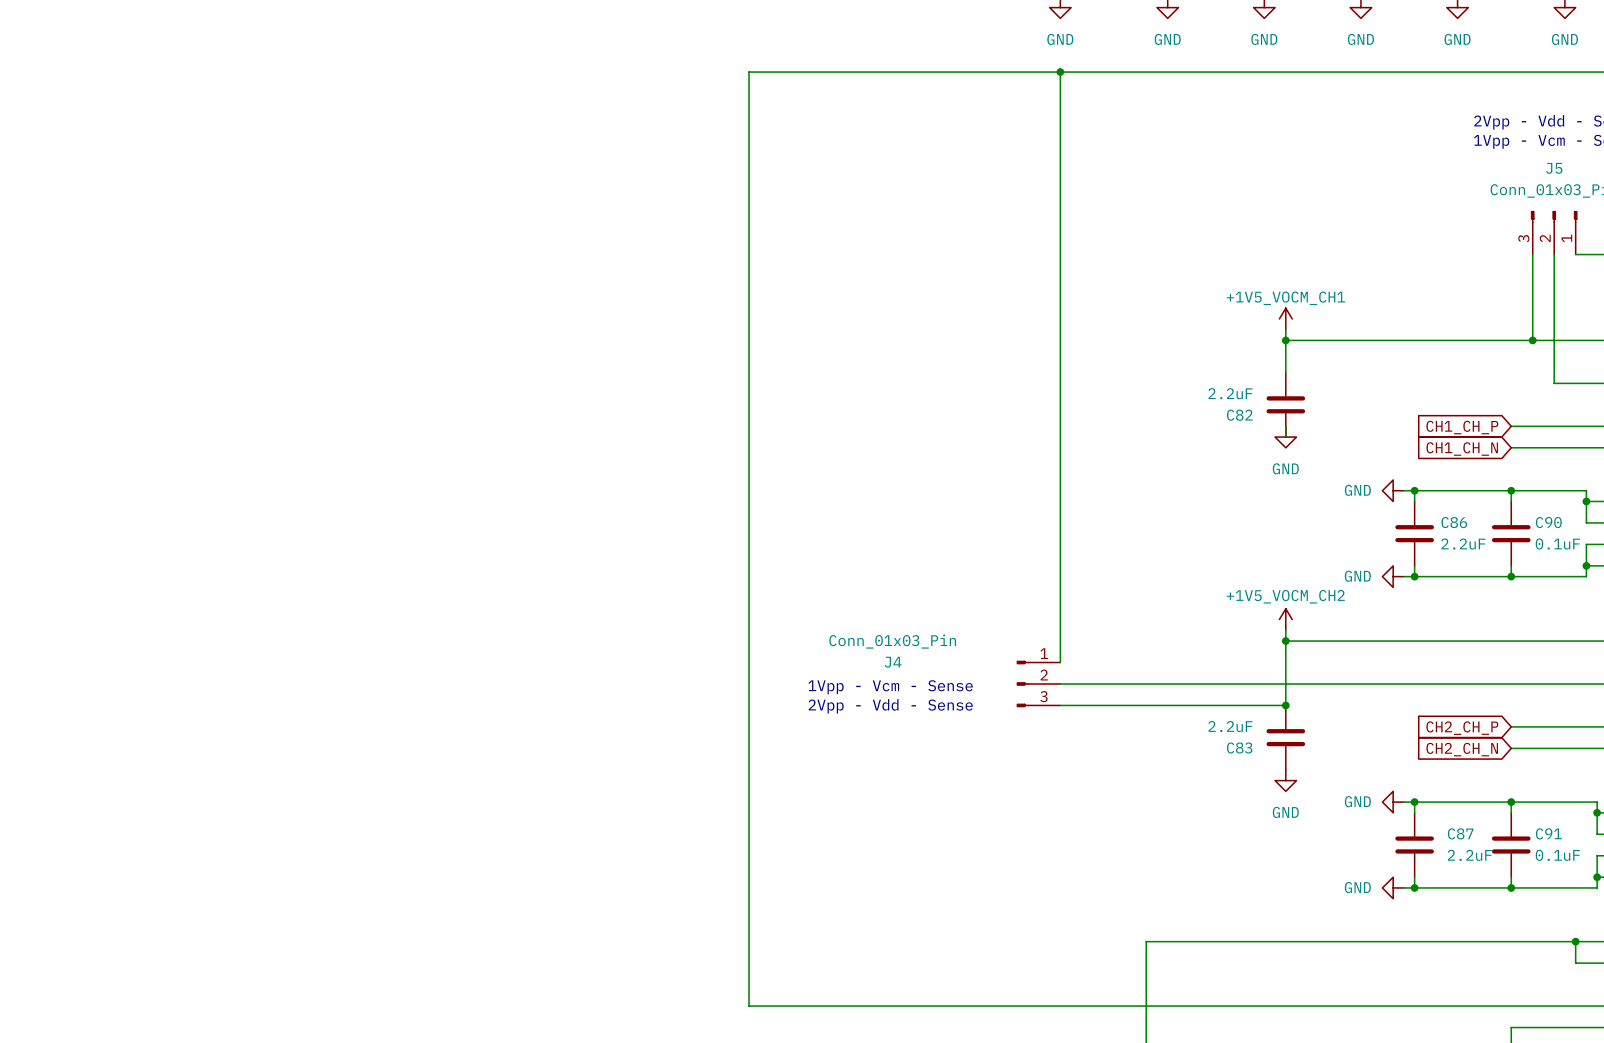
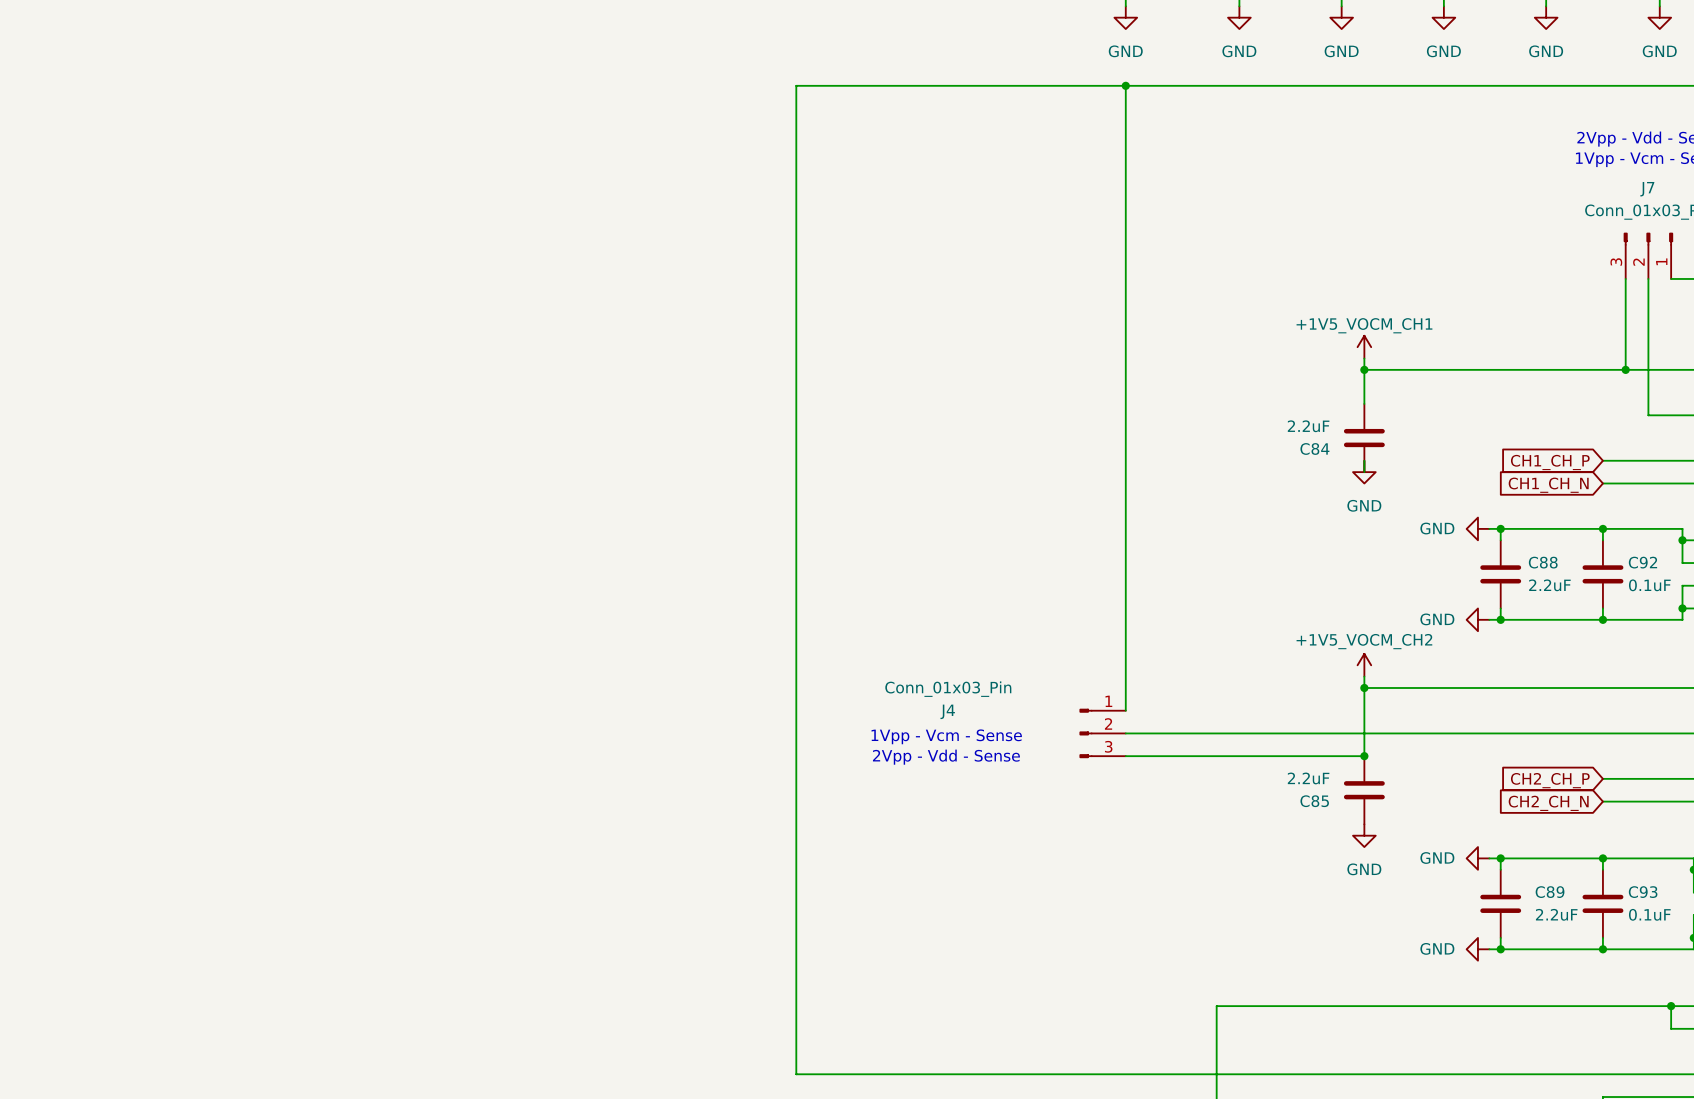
J5 name: J5 (1554, 168) -> J7 (1647, 189)
C82 name: C82 (1239, 415) -> C84 (1314, 448)
C86 name: C86 (1454, 522) -> C88 (1543, 562)
C90 name: C90 (1548, 522) -> C92 (1642, 562)
C83 name: C83 (1239, 748) -> C85 (1314, 801)
C87 name: C87 (1460, 833) -> C89 (1550, 892)
C91 name: C91 (1548, 833) -> C93 (1643, 892)

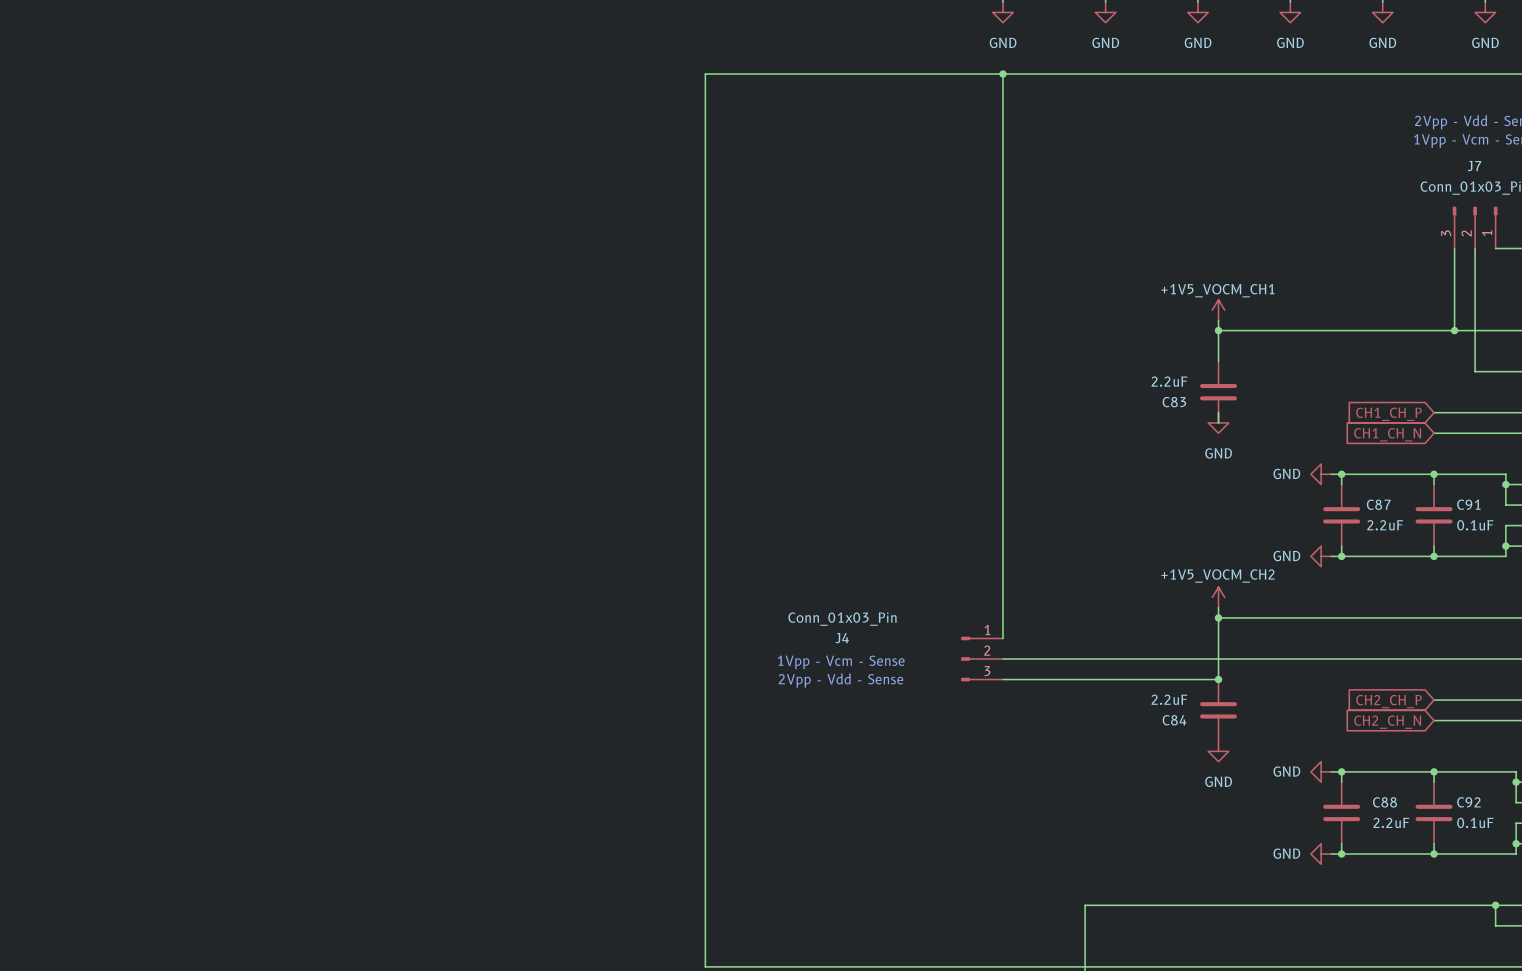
C84 name: C84 (1314, 448) -> C83 (1174, 402)
C88 name: C88 (1543, 562) -> C87 (1378, 504)
C92 name: C92 (1642, 562) -> C91 (1468, 504)
C85 name: C85 (1314, 801) -> C84 (1174, 720)
C89 name: C89 (1550, 892) -> C88 (1385, 802)
C93 name: C93 (1643, 892) -> C92 (1468, 802)

